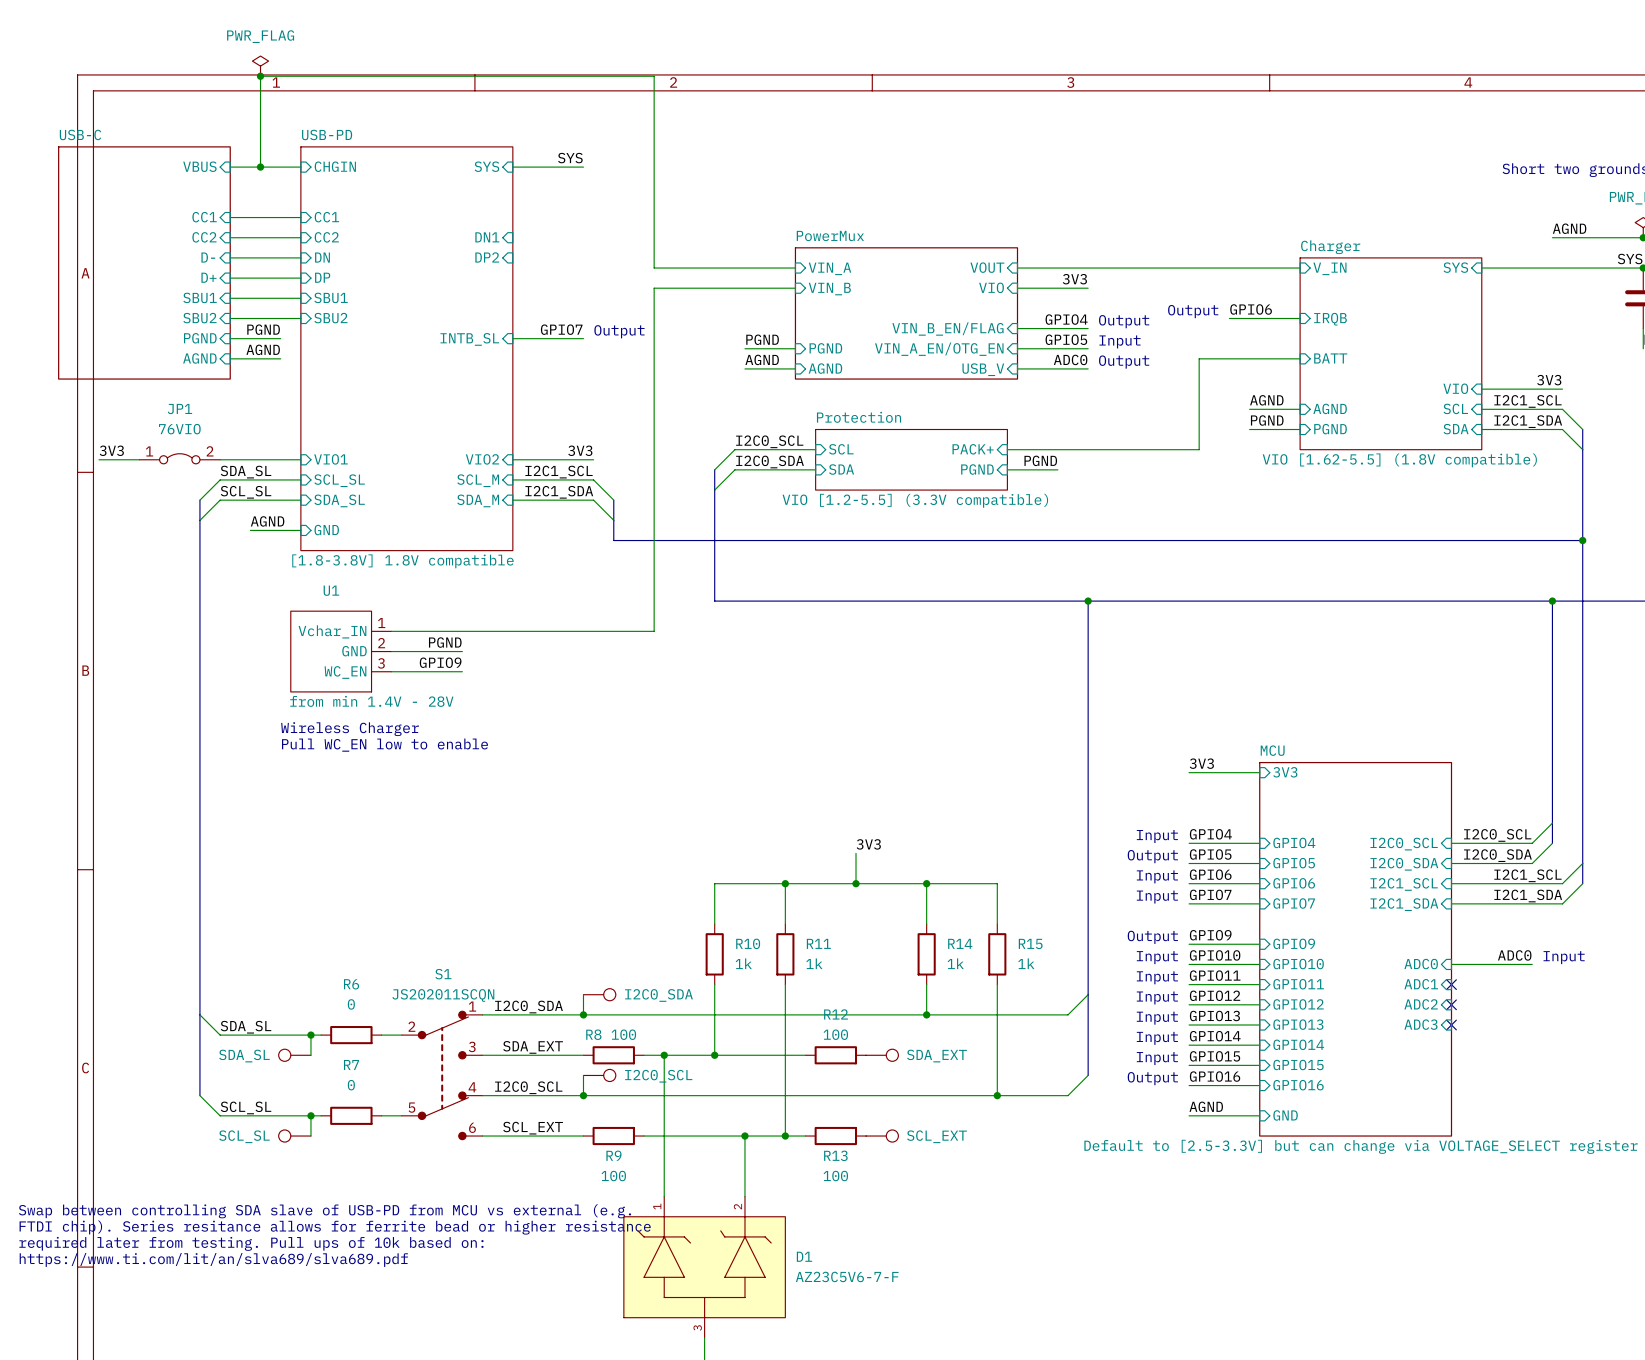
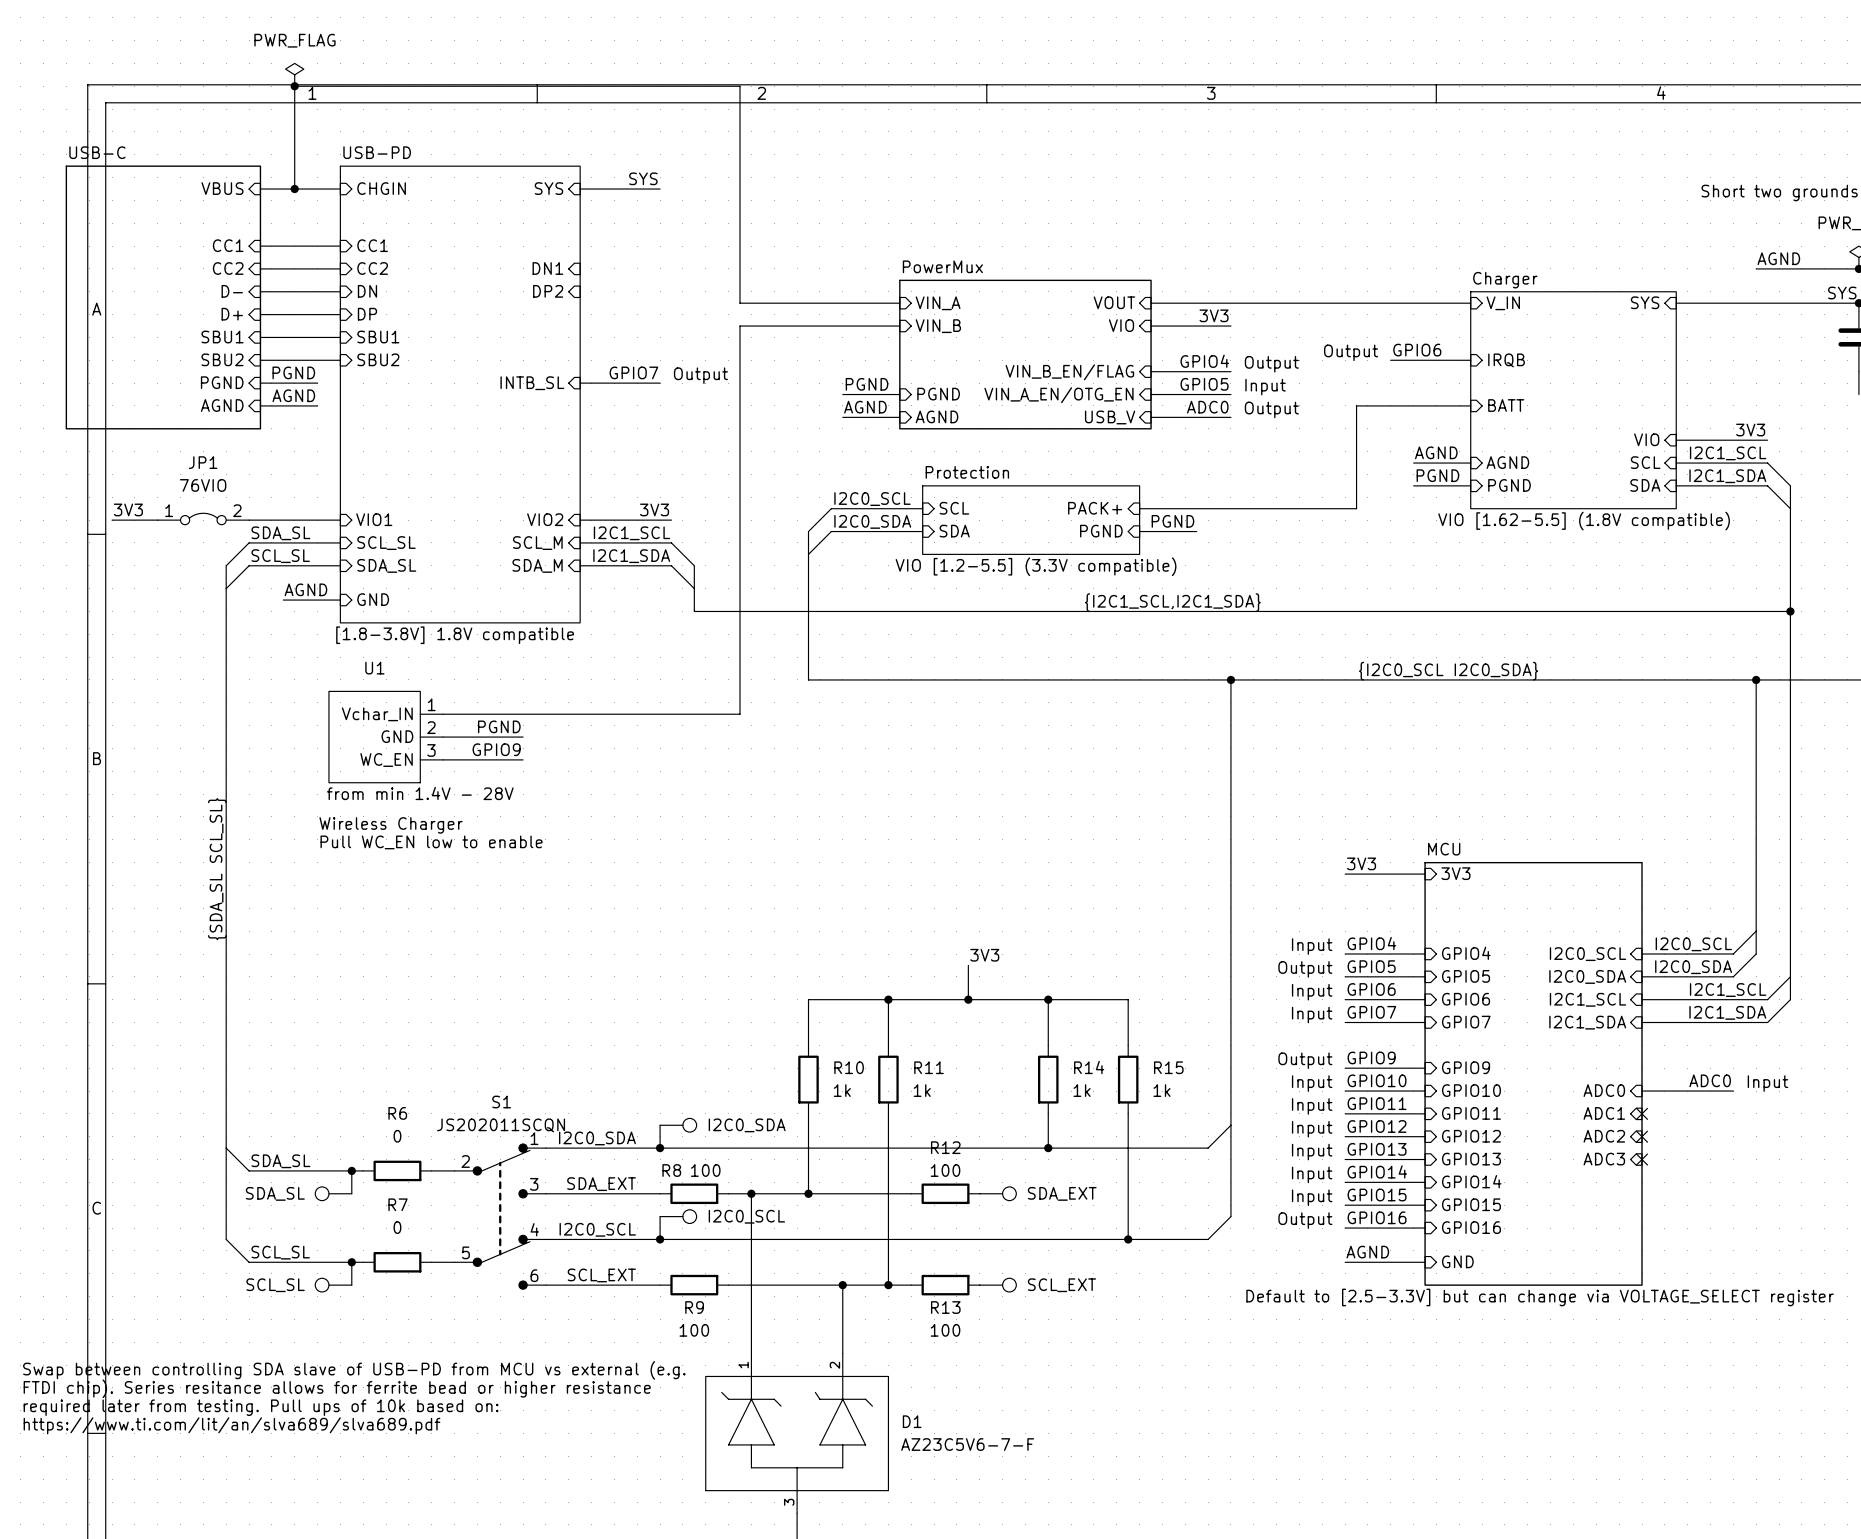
label: none -> {I2C1_SCL,I2C1_SDA} (1172, 602)
label: none -> {I2C0_SCL I2C0_SDA} (1448, 671)
label: none -> {SDA_SL SCL_SL} (217, 869)

